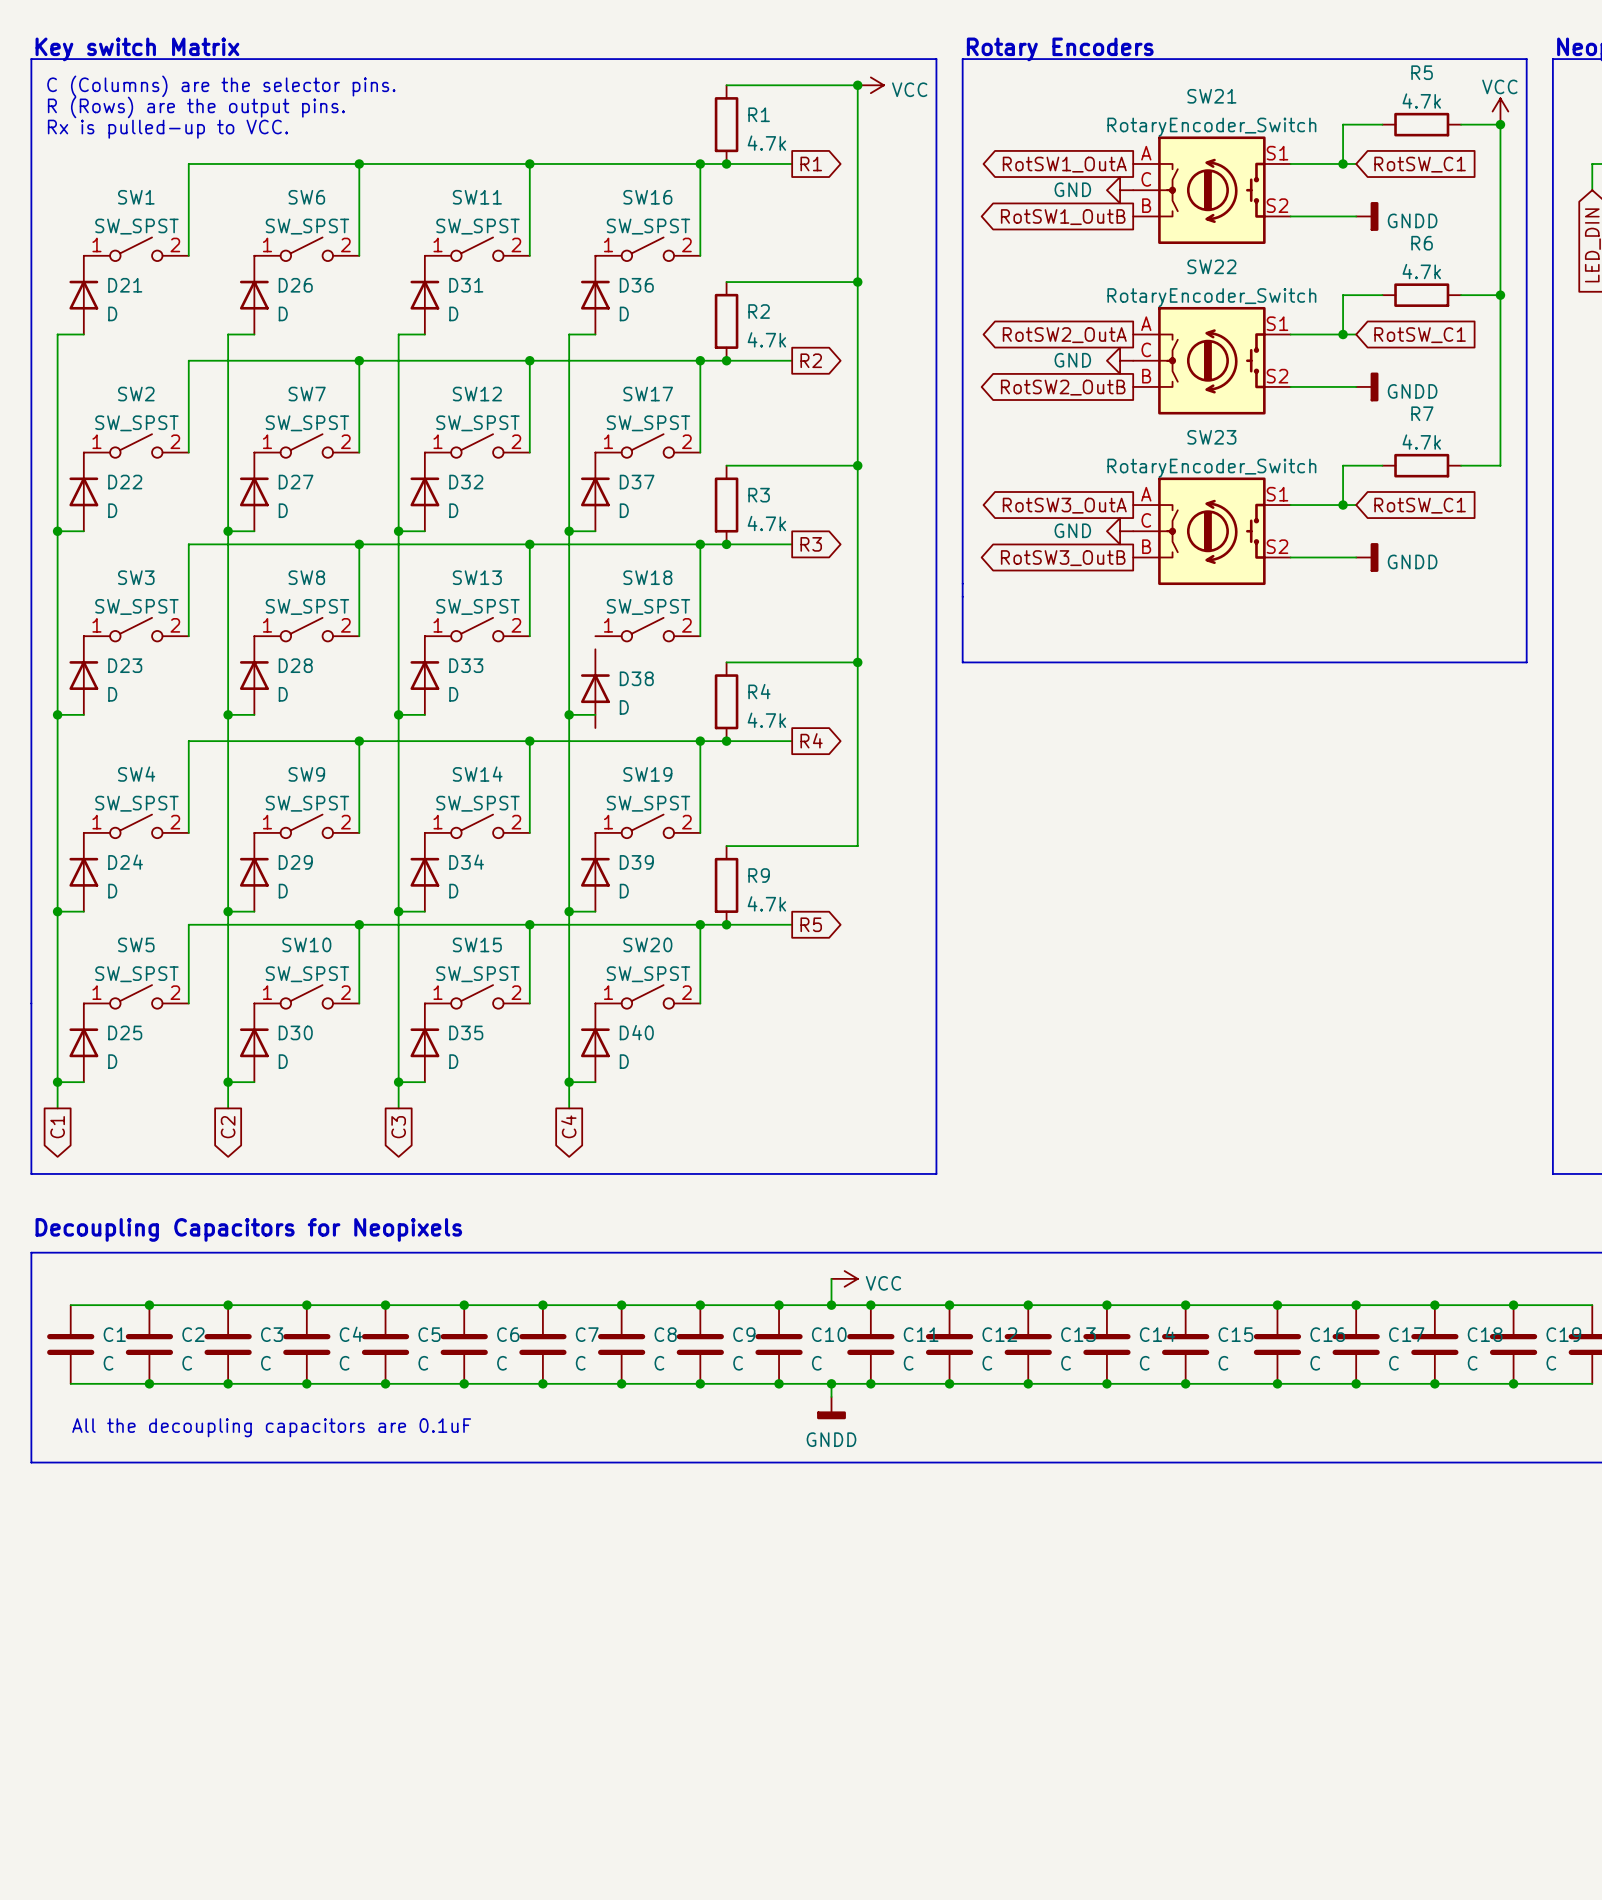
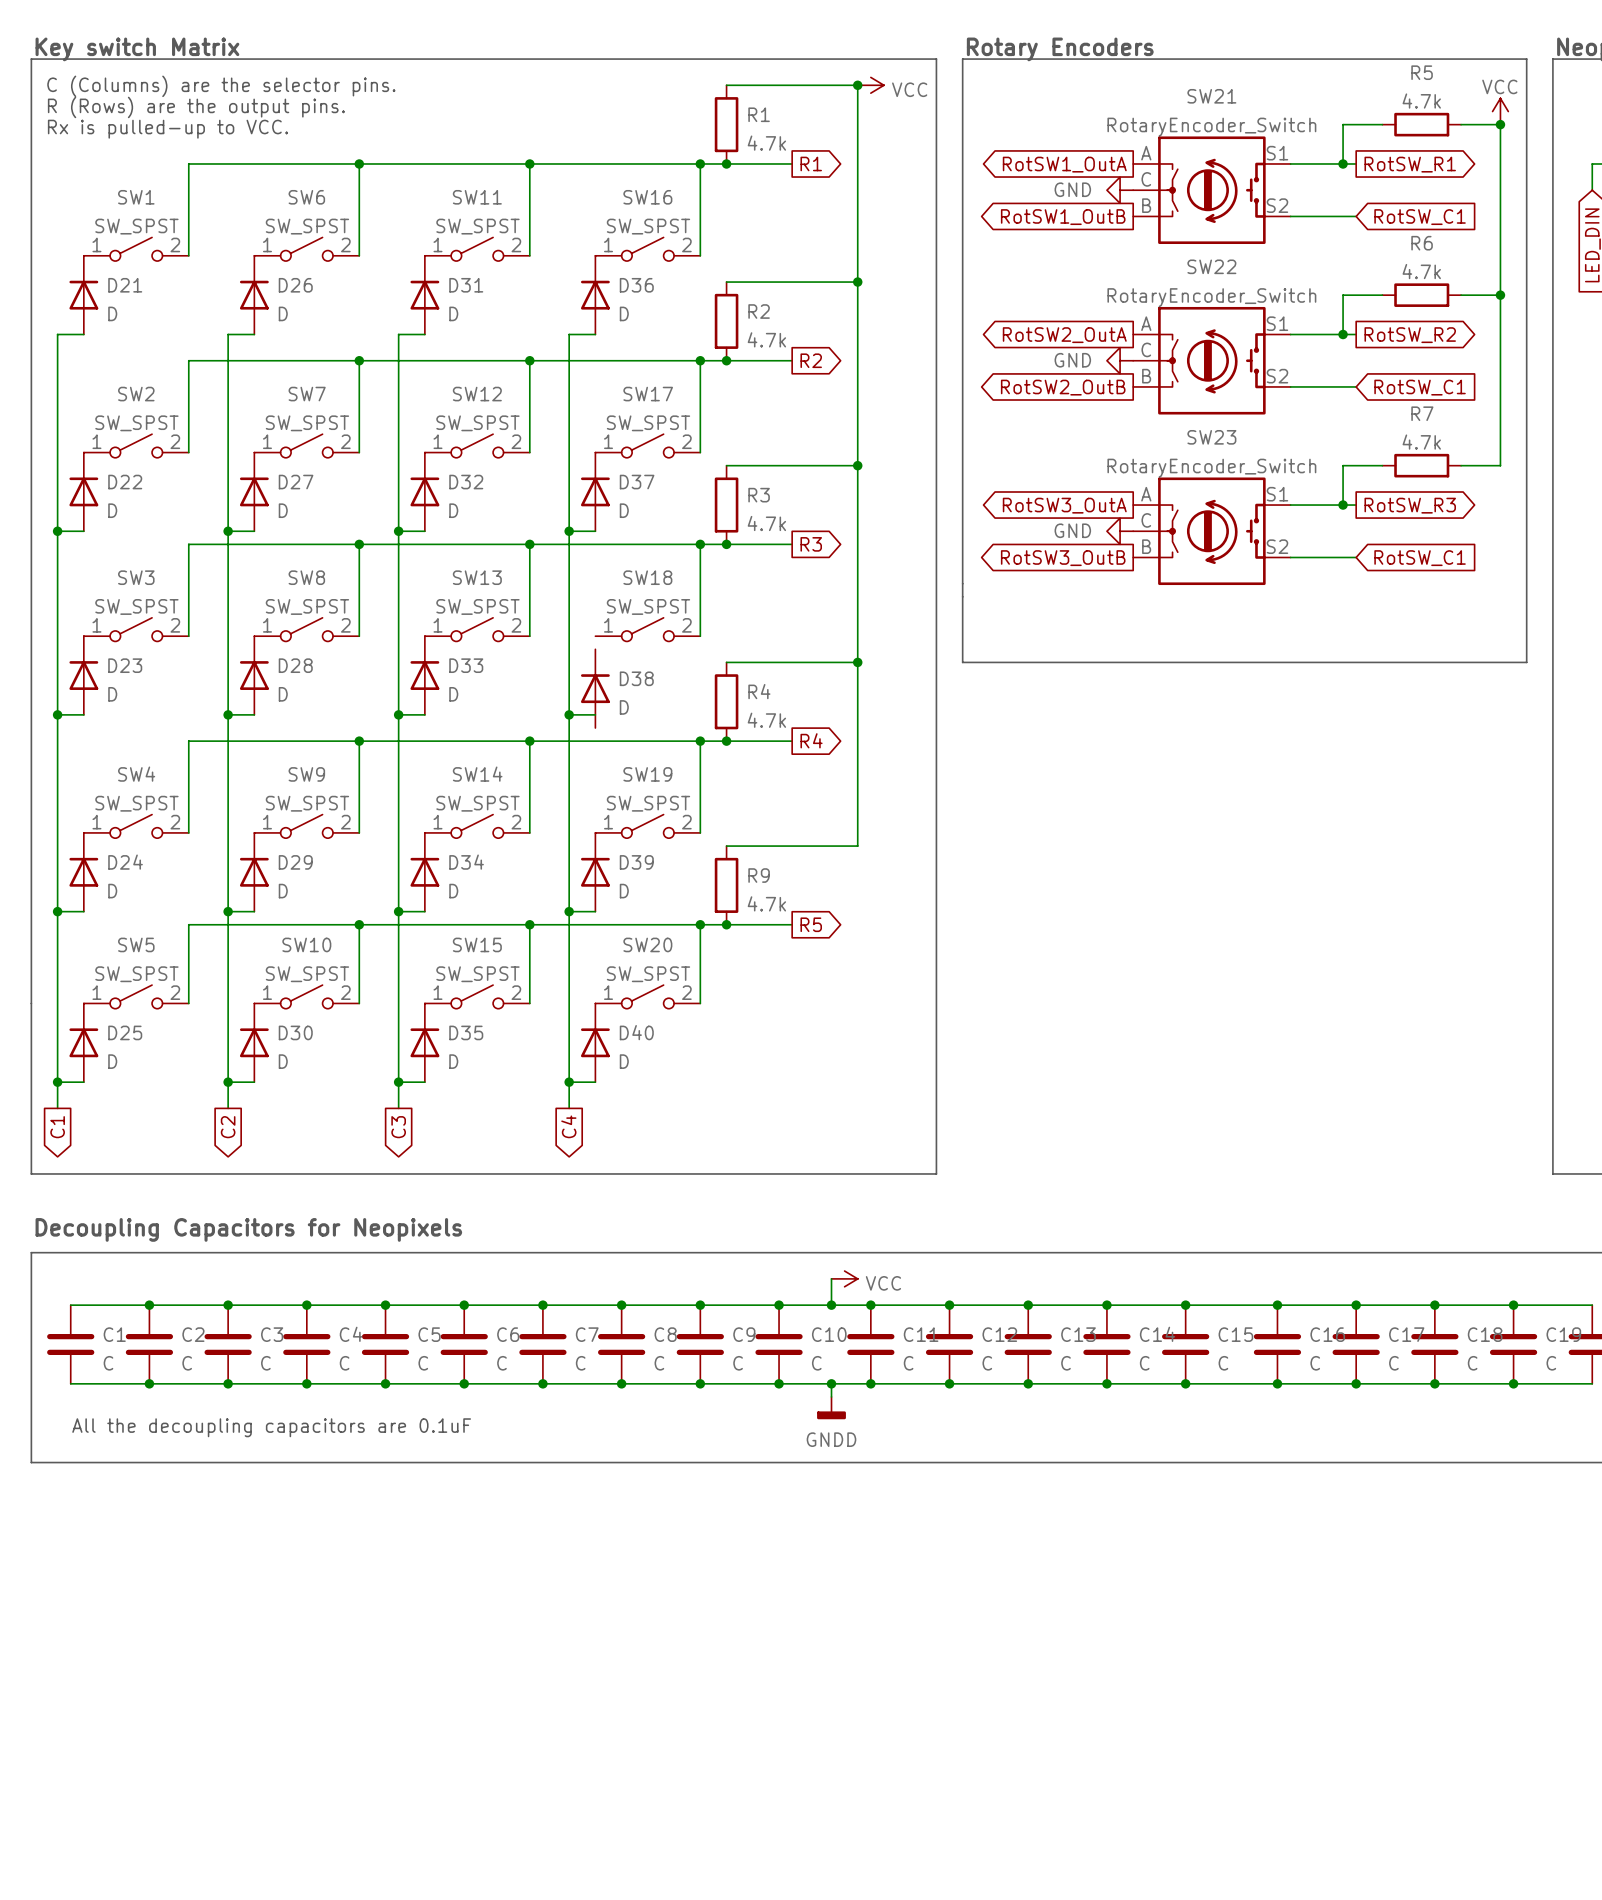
global label shape: input (1420, 164) -> output (1410, 164)
global label: RotSW_C1 (1420, 164) -> RotSW_R1 (1410, 164)
power symbol: GNDD (1367, 216) -> none
global label: none -> RotSW_C1 (1420, 217)
global label shape: input (1420, 335) -> output (1410, 335)
global label: RotSW_C1 (1420, 335) -> RotSW_R2 (1410, 335)
power symbol: GNDD (1367, 386) -> none
global label: none -> RotSW_C1 (1420, 387)
global label shape: input (1420, 505) -> output (1410, 505)
global label: RotSW_C1 (1420, 505) -> RotSW_R3 (1410, 505)
power symbol: GNDD (1367, 557) -> none
global label: none -> RotSW_C1 (1420, 558)

